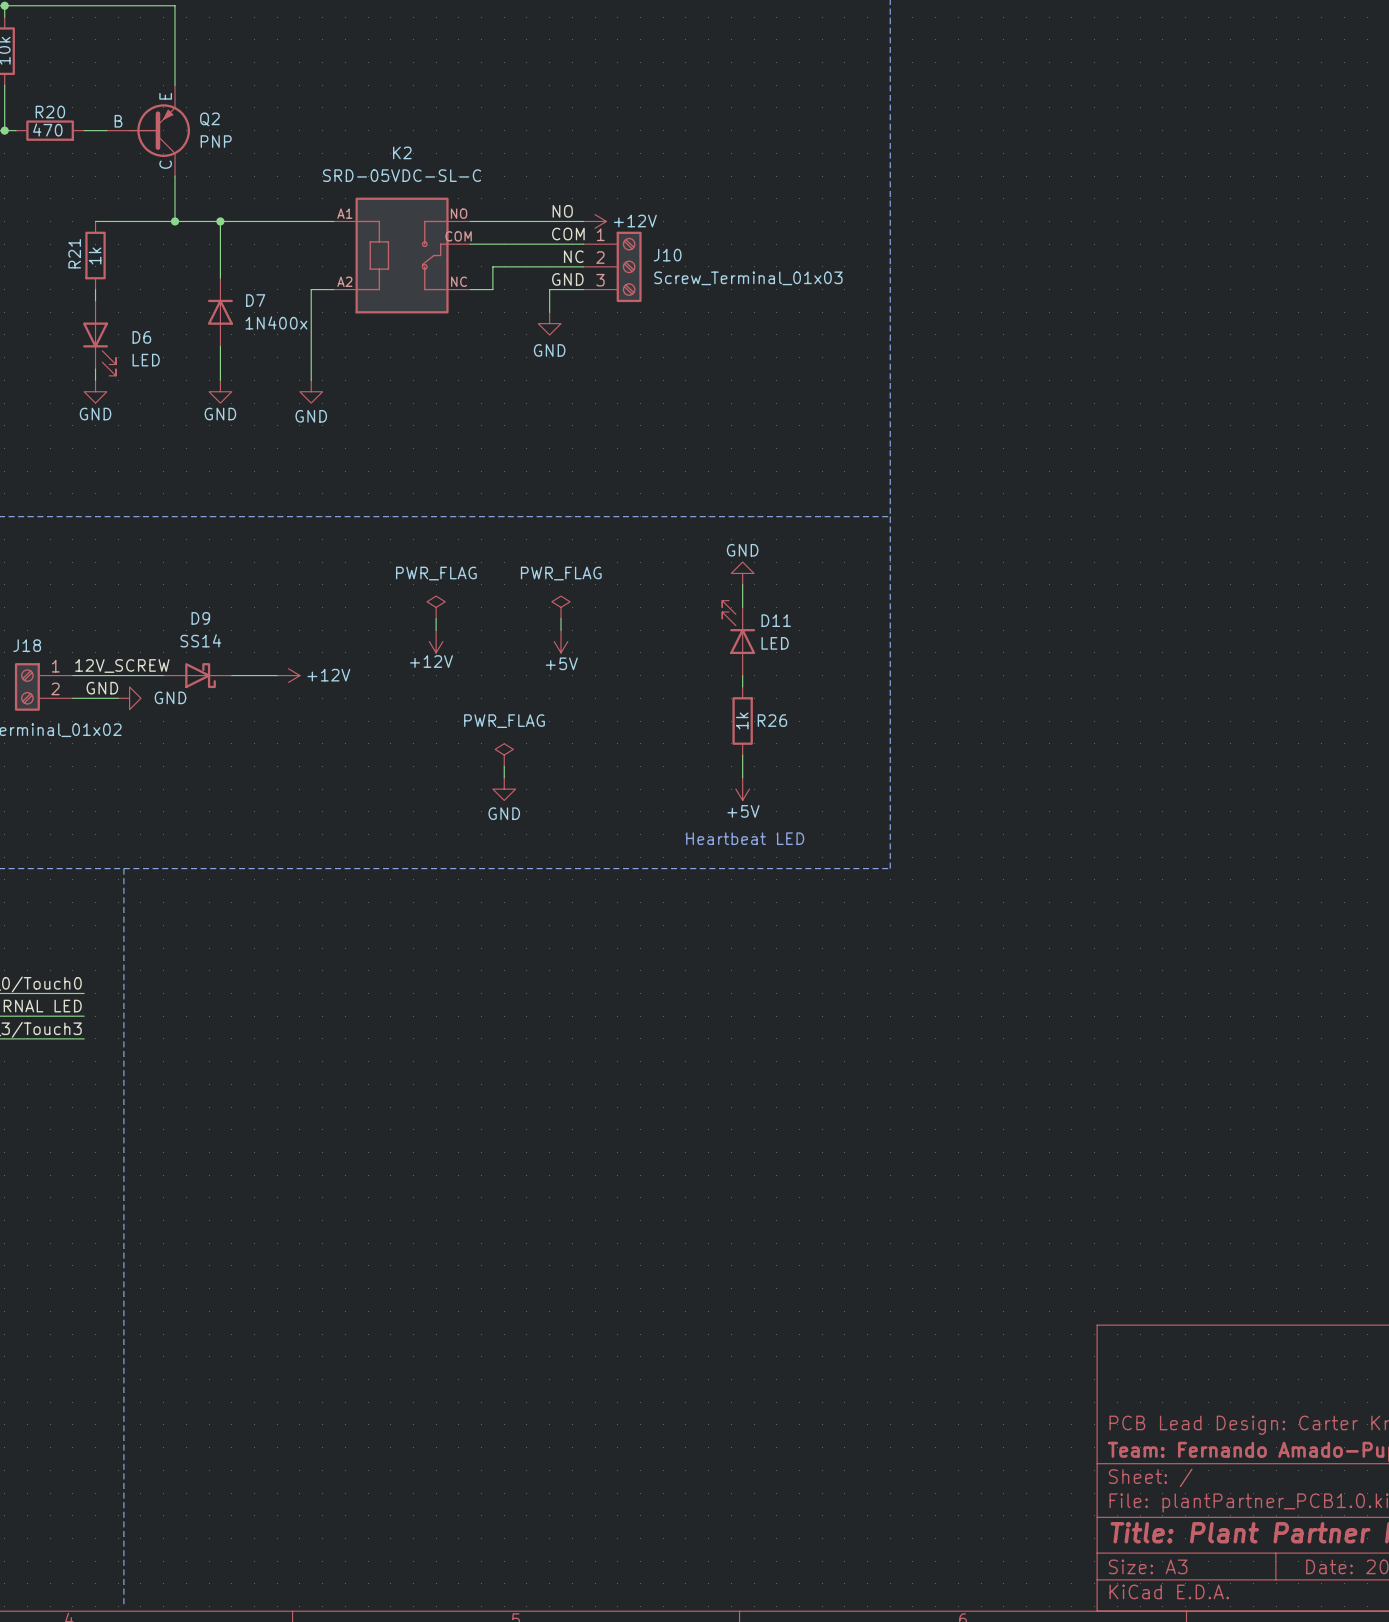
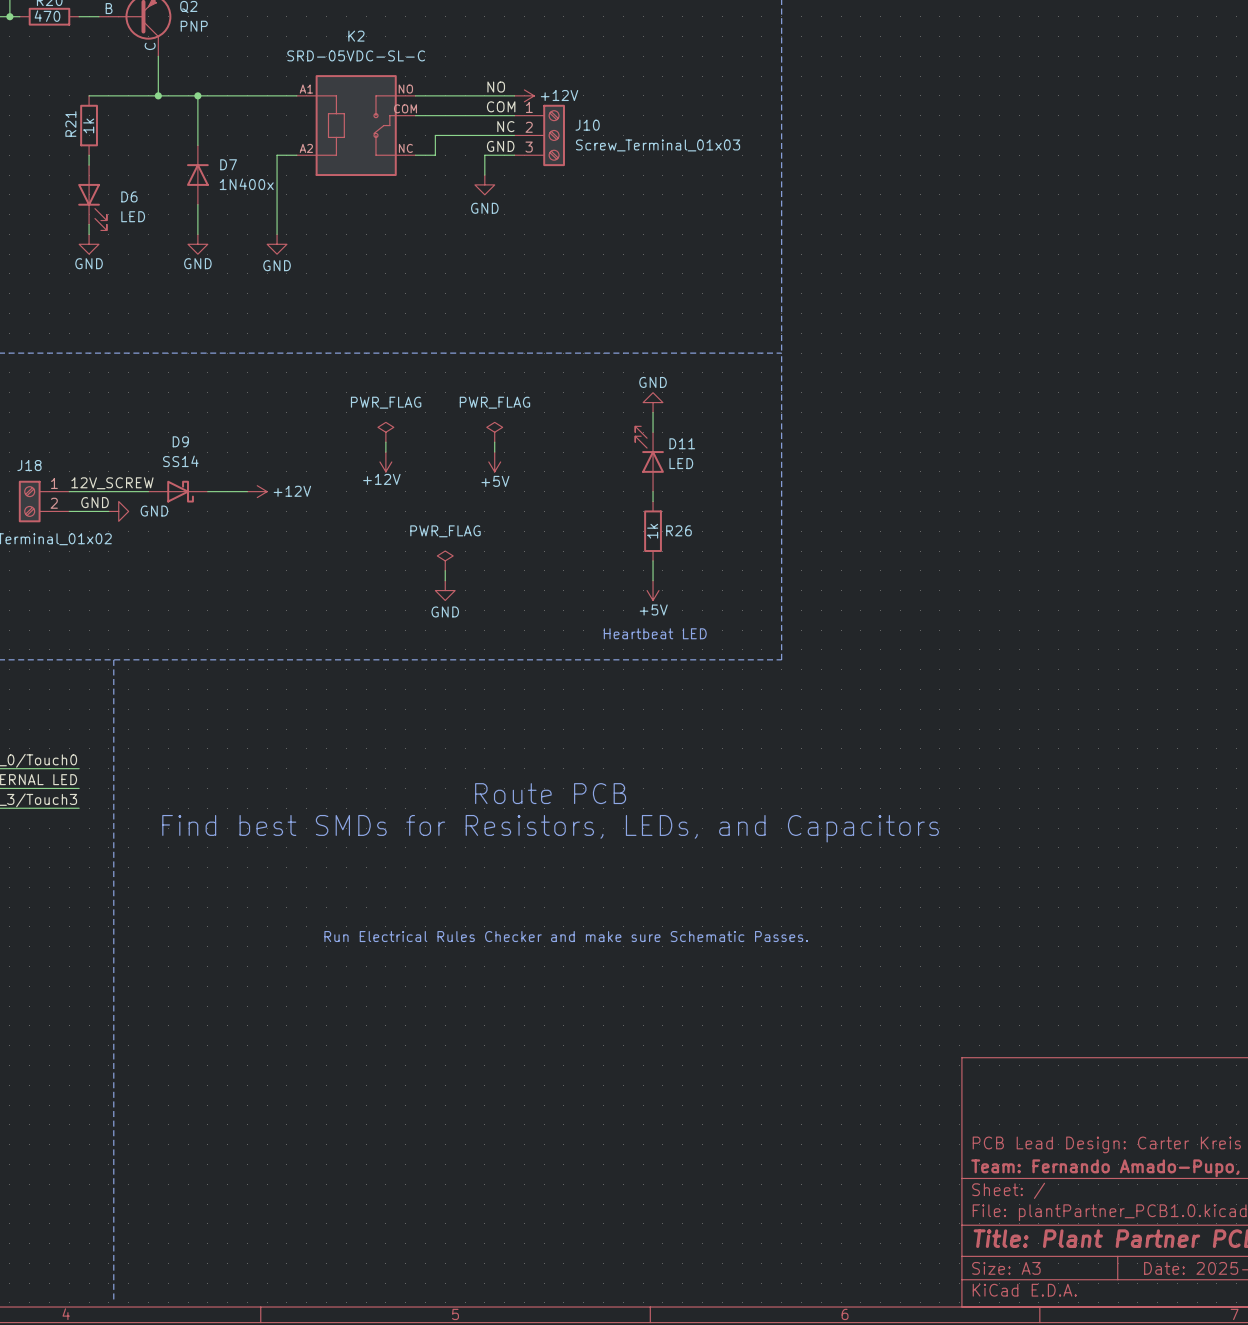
text: none -> Route PCB (550, 793)
text: none -> Find best SMDs for Resistors, LEDs, and Capacitors (550, 828)
text: none -> Run Electrical Rules Checker and make sure Schematic Passes. (566, 936)

